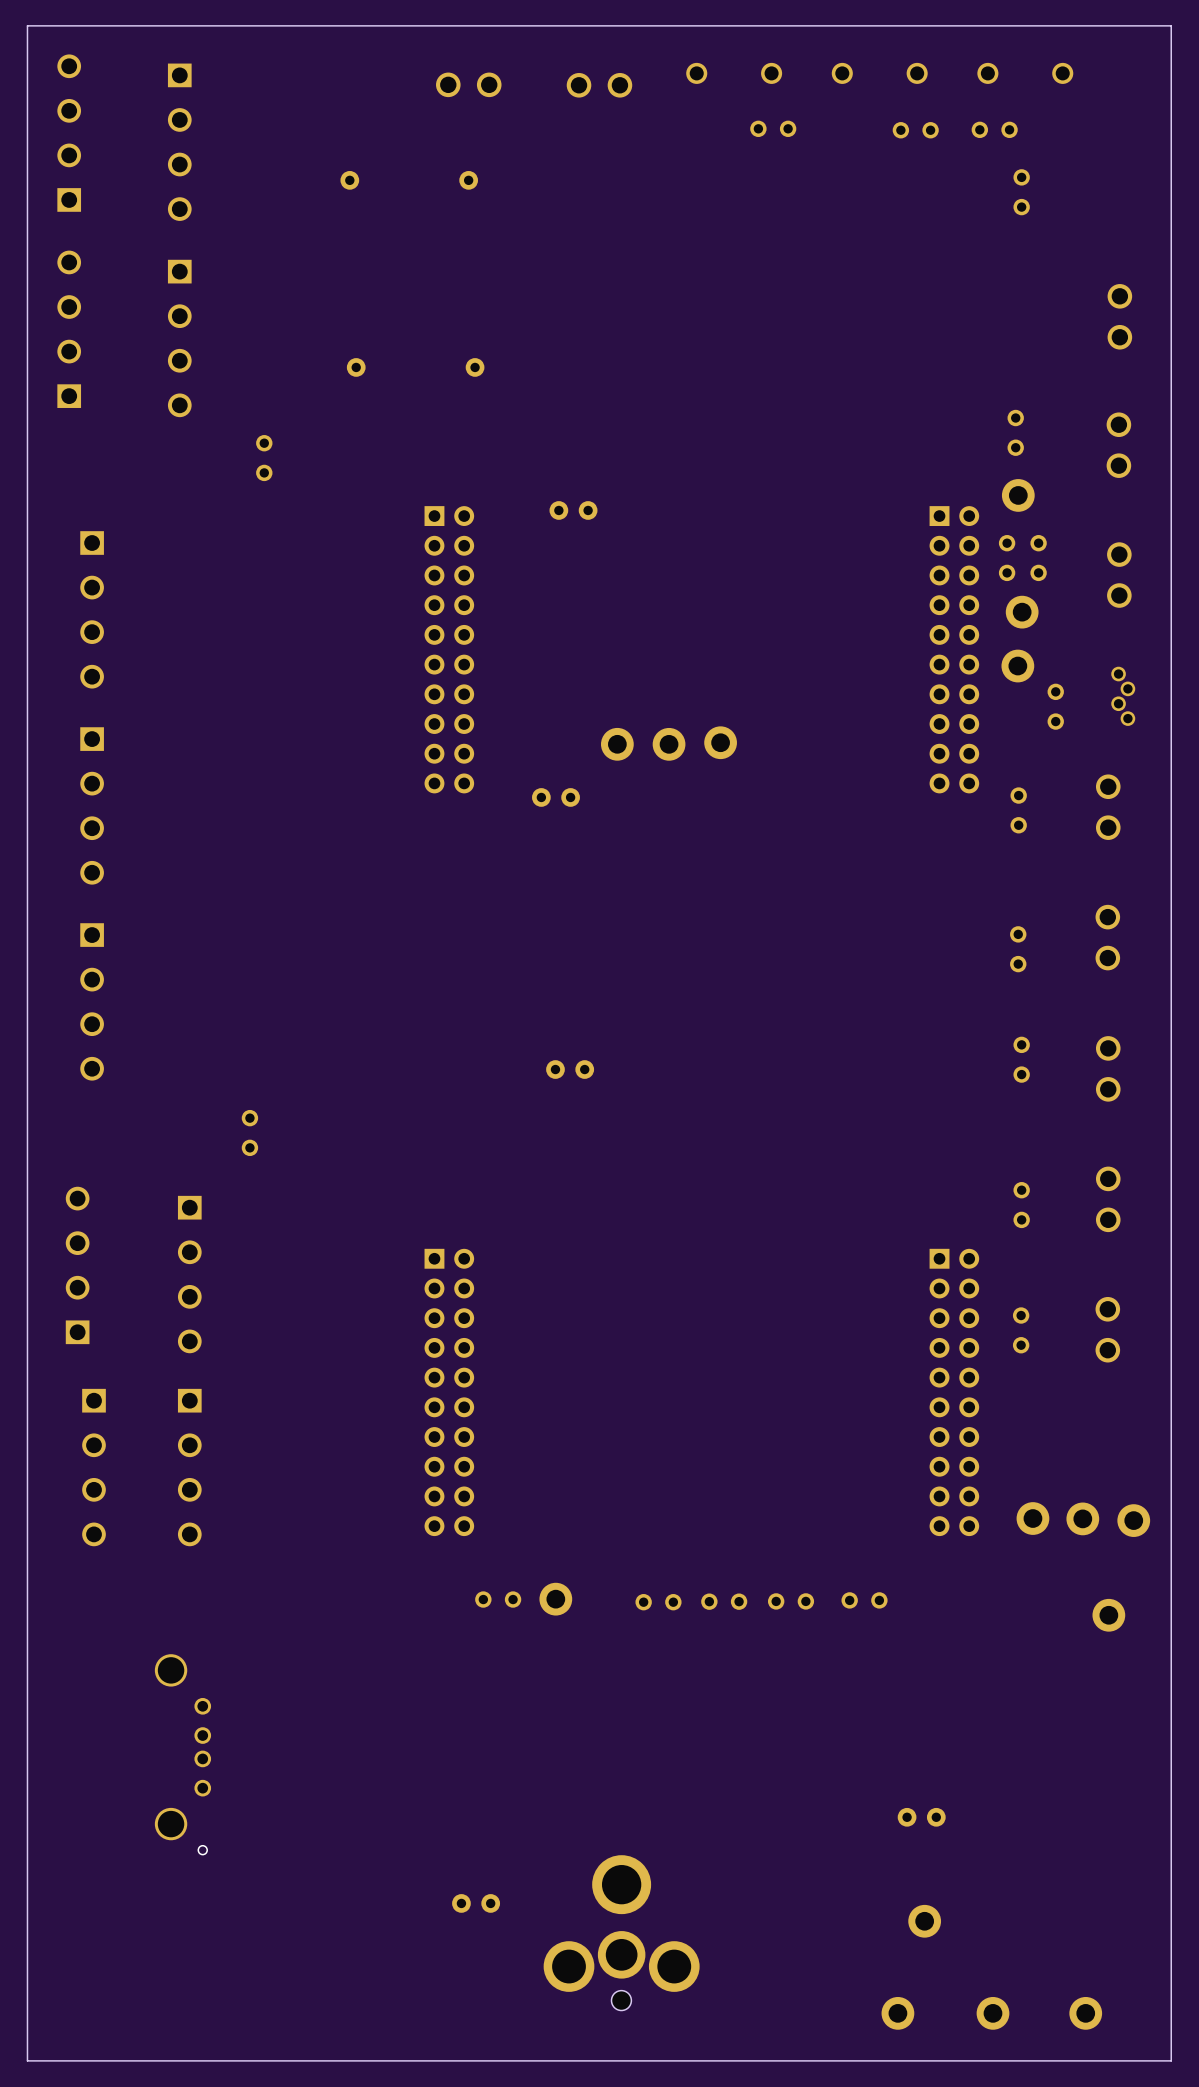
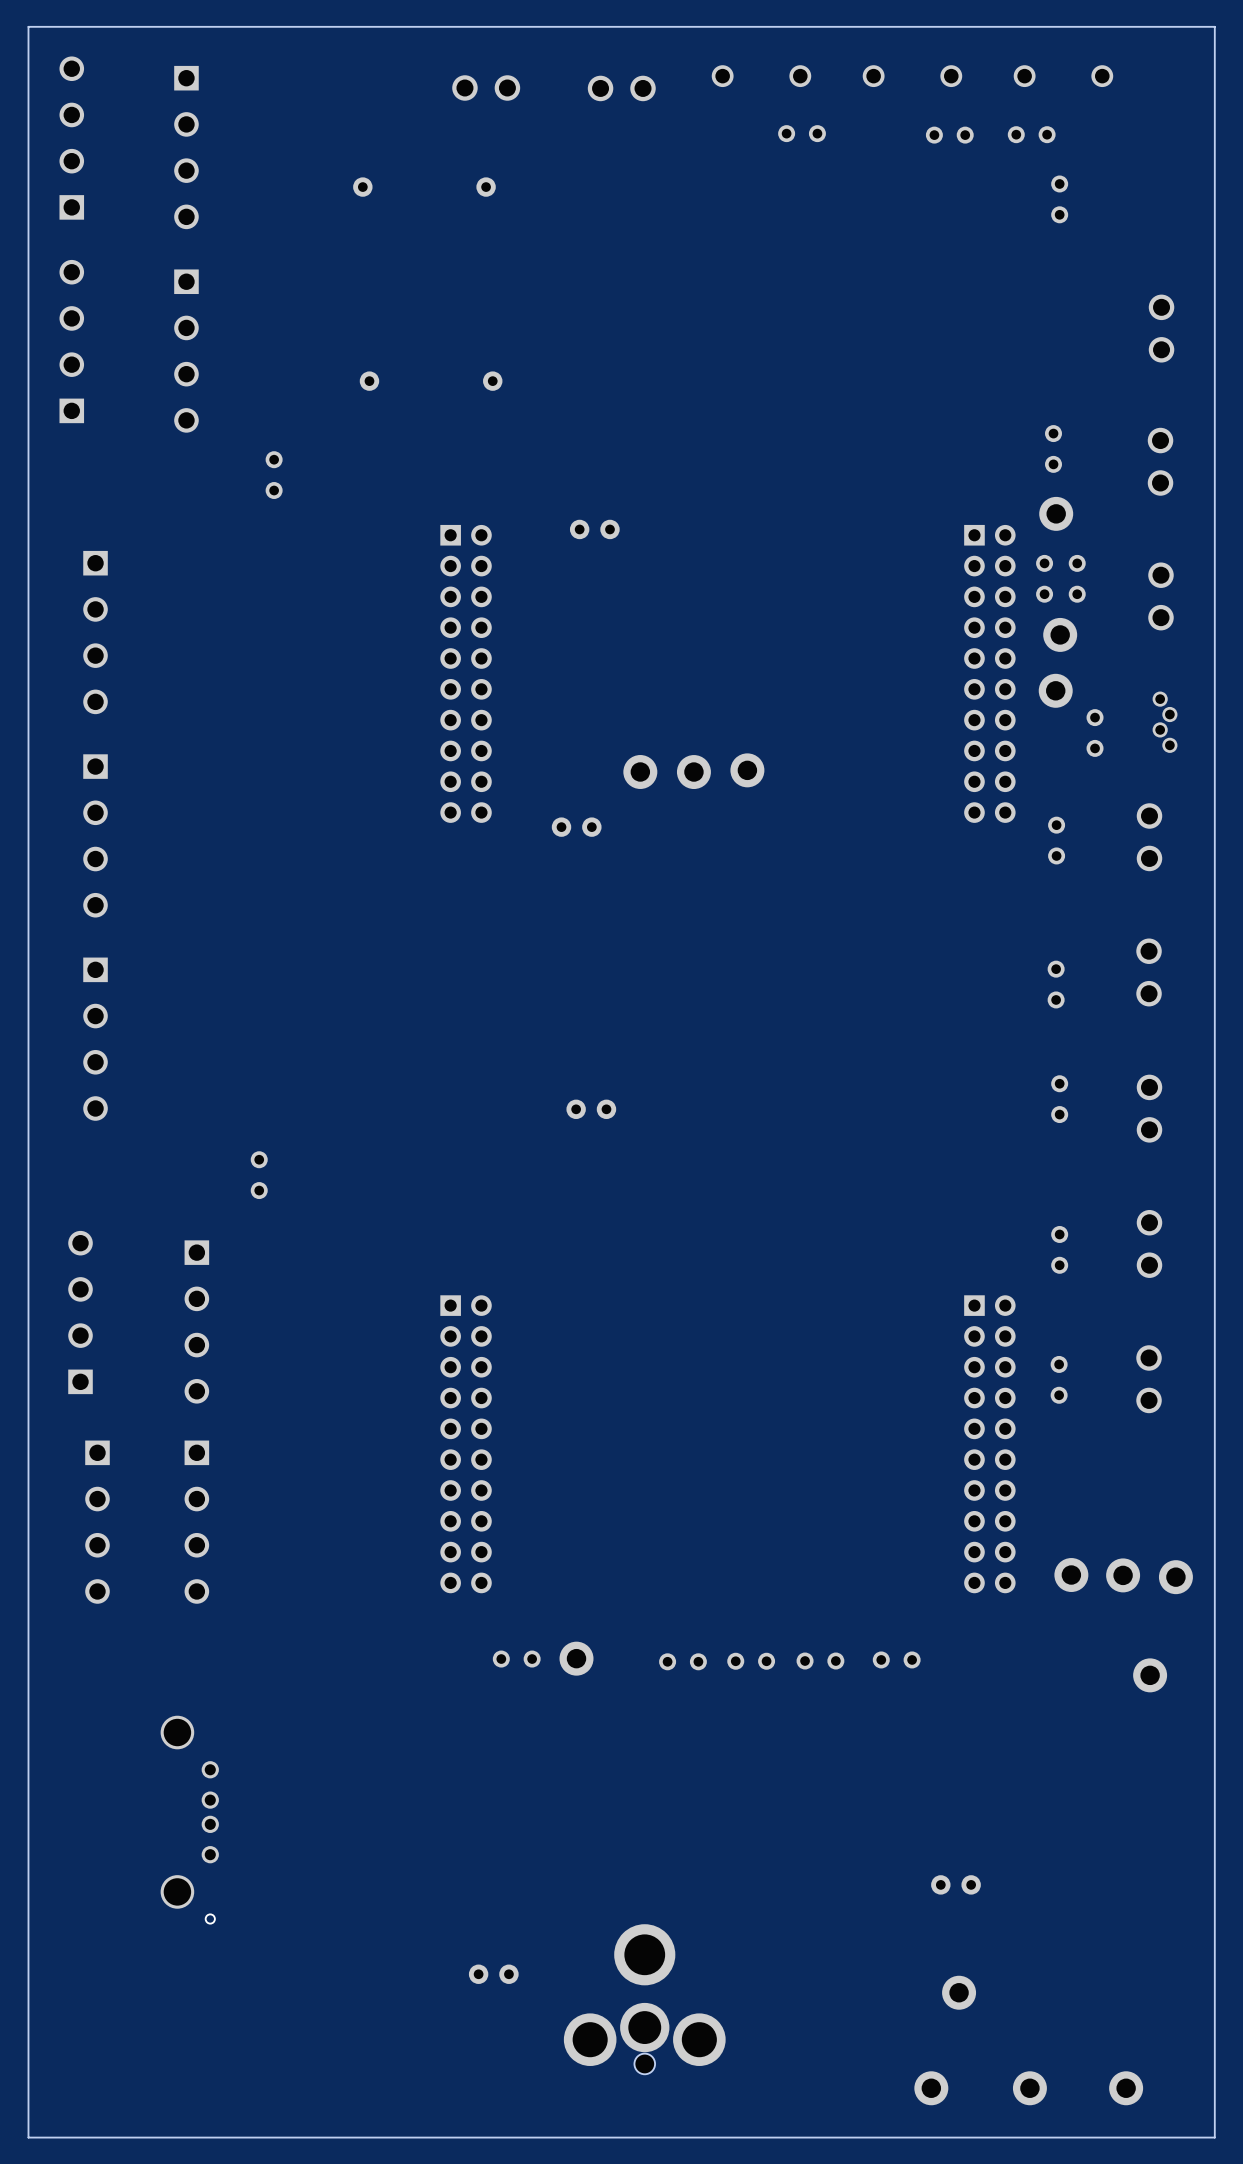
part footprint: [543, 1855, 700, 2011] -> [563, 1924, 726, 2075]

